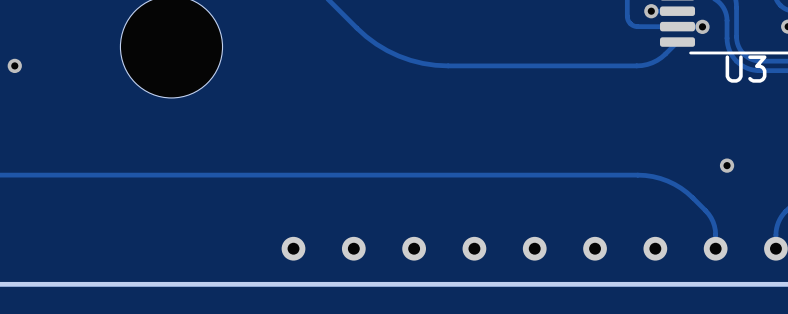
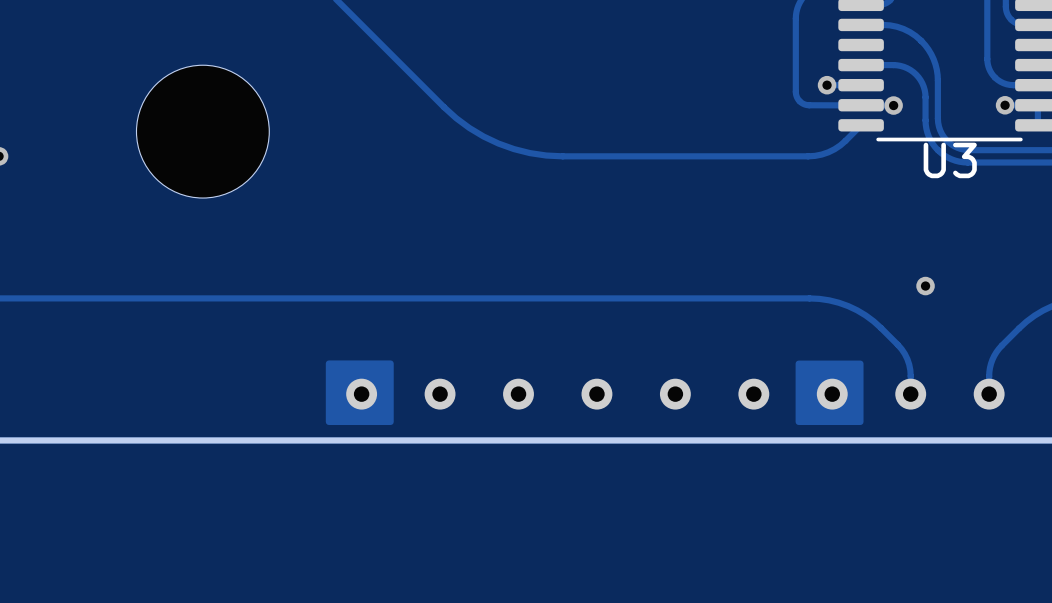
drawing: none -> [325, 360, 394, 426]
drawing: none -> [795, 360, 864, 426]

